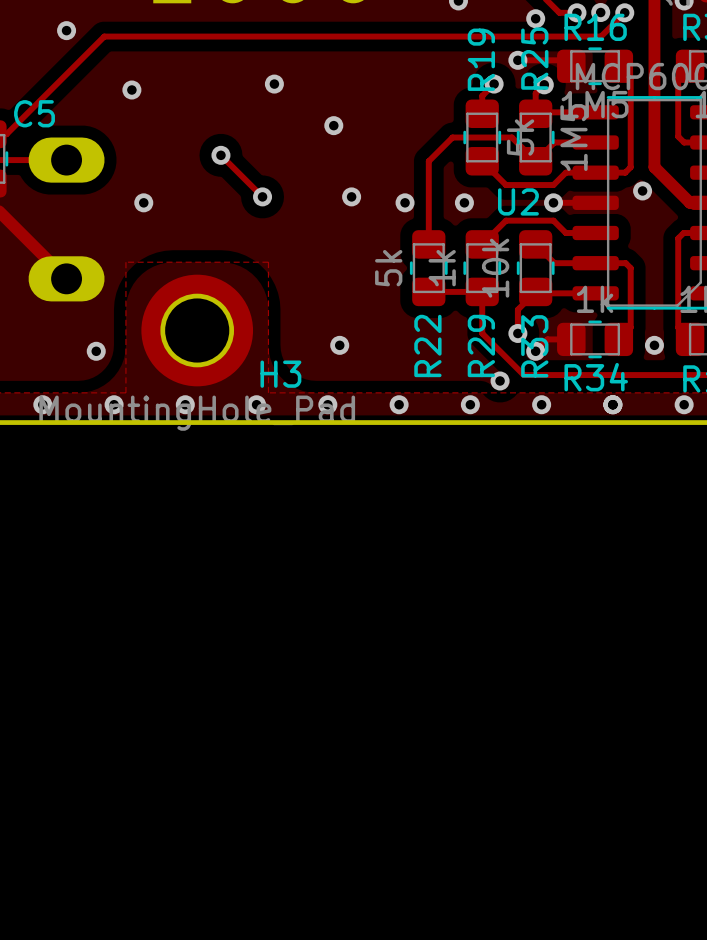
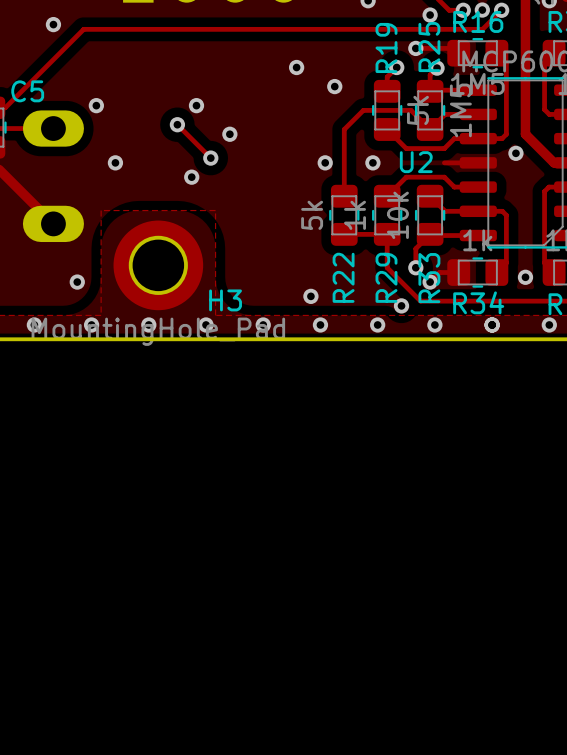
via: (274, 84) -> none
via: none -> (296, 67)
via position: (131, 90) -> (96, 105)
via: none -> (334, 86)
via: (333, 125) -> none
via: none -> (196, 105)
via: none -> (229, 134)
via: (351, 196) -> none
via: (553, 202) -> none
via: none -> (191, 177)
via position: (339, 345) -> (310, 296)

